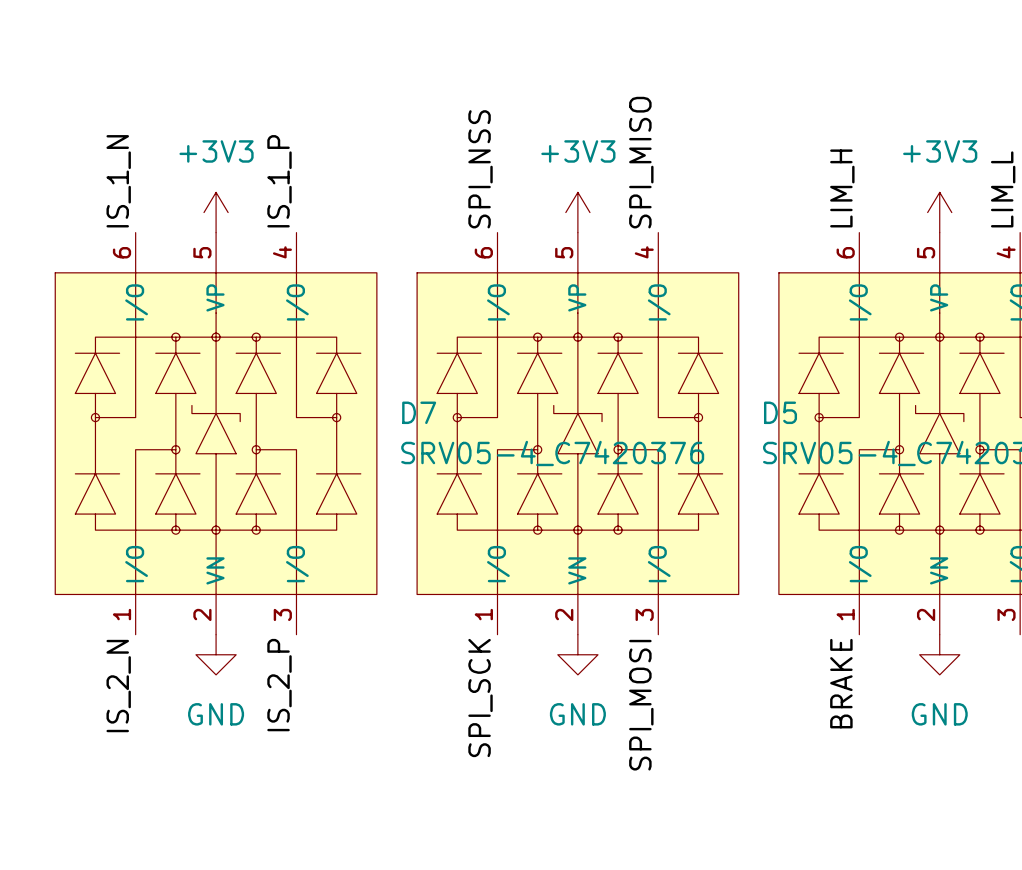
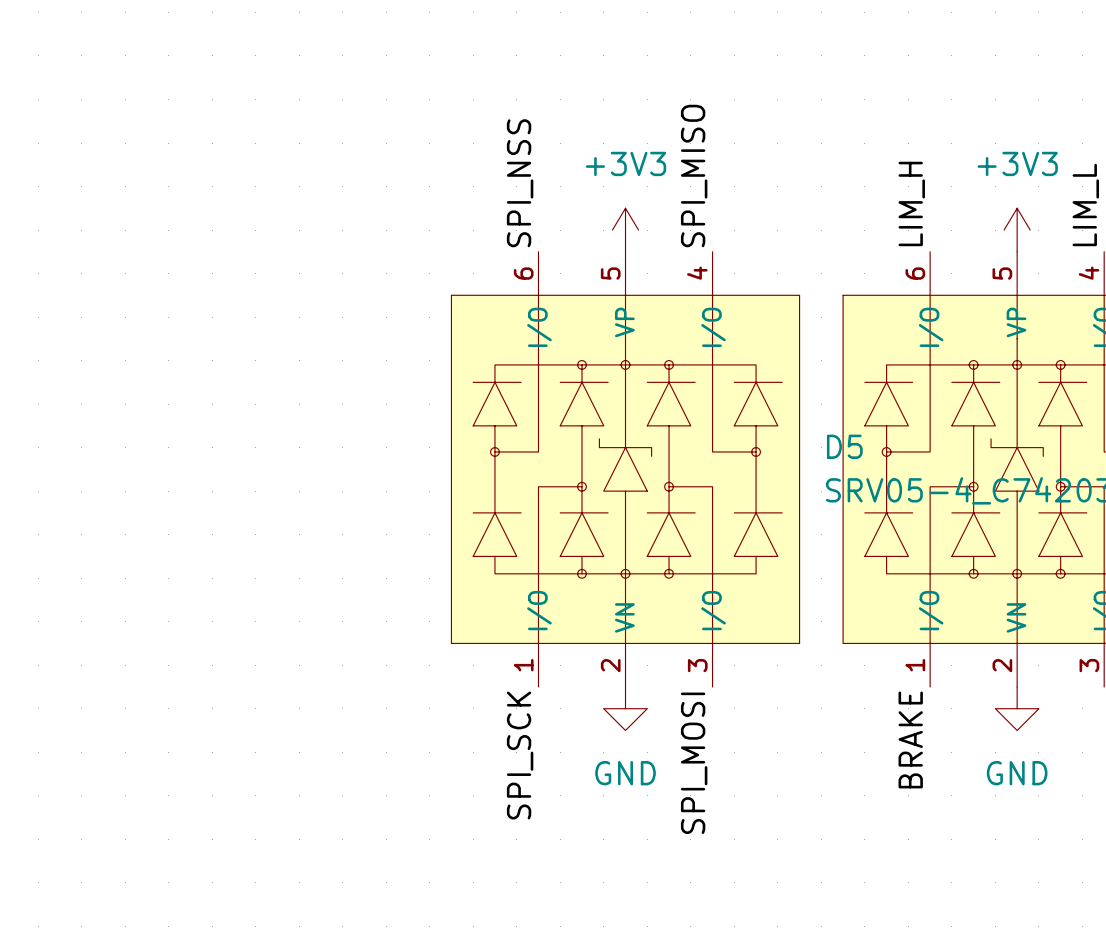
label: IS_1_N (118, 181) -> none
label: IS_1_P (279, 181) -> none
power symbol: +3V3 (216, 212) -> none
D7: SRV05-4_C7420376 (216, 433) -> none
power symbol: GND (216, 654) -> none
label: IS_2_P (279, 685) -> none
label: IS_2_N (118, 686) -> none

